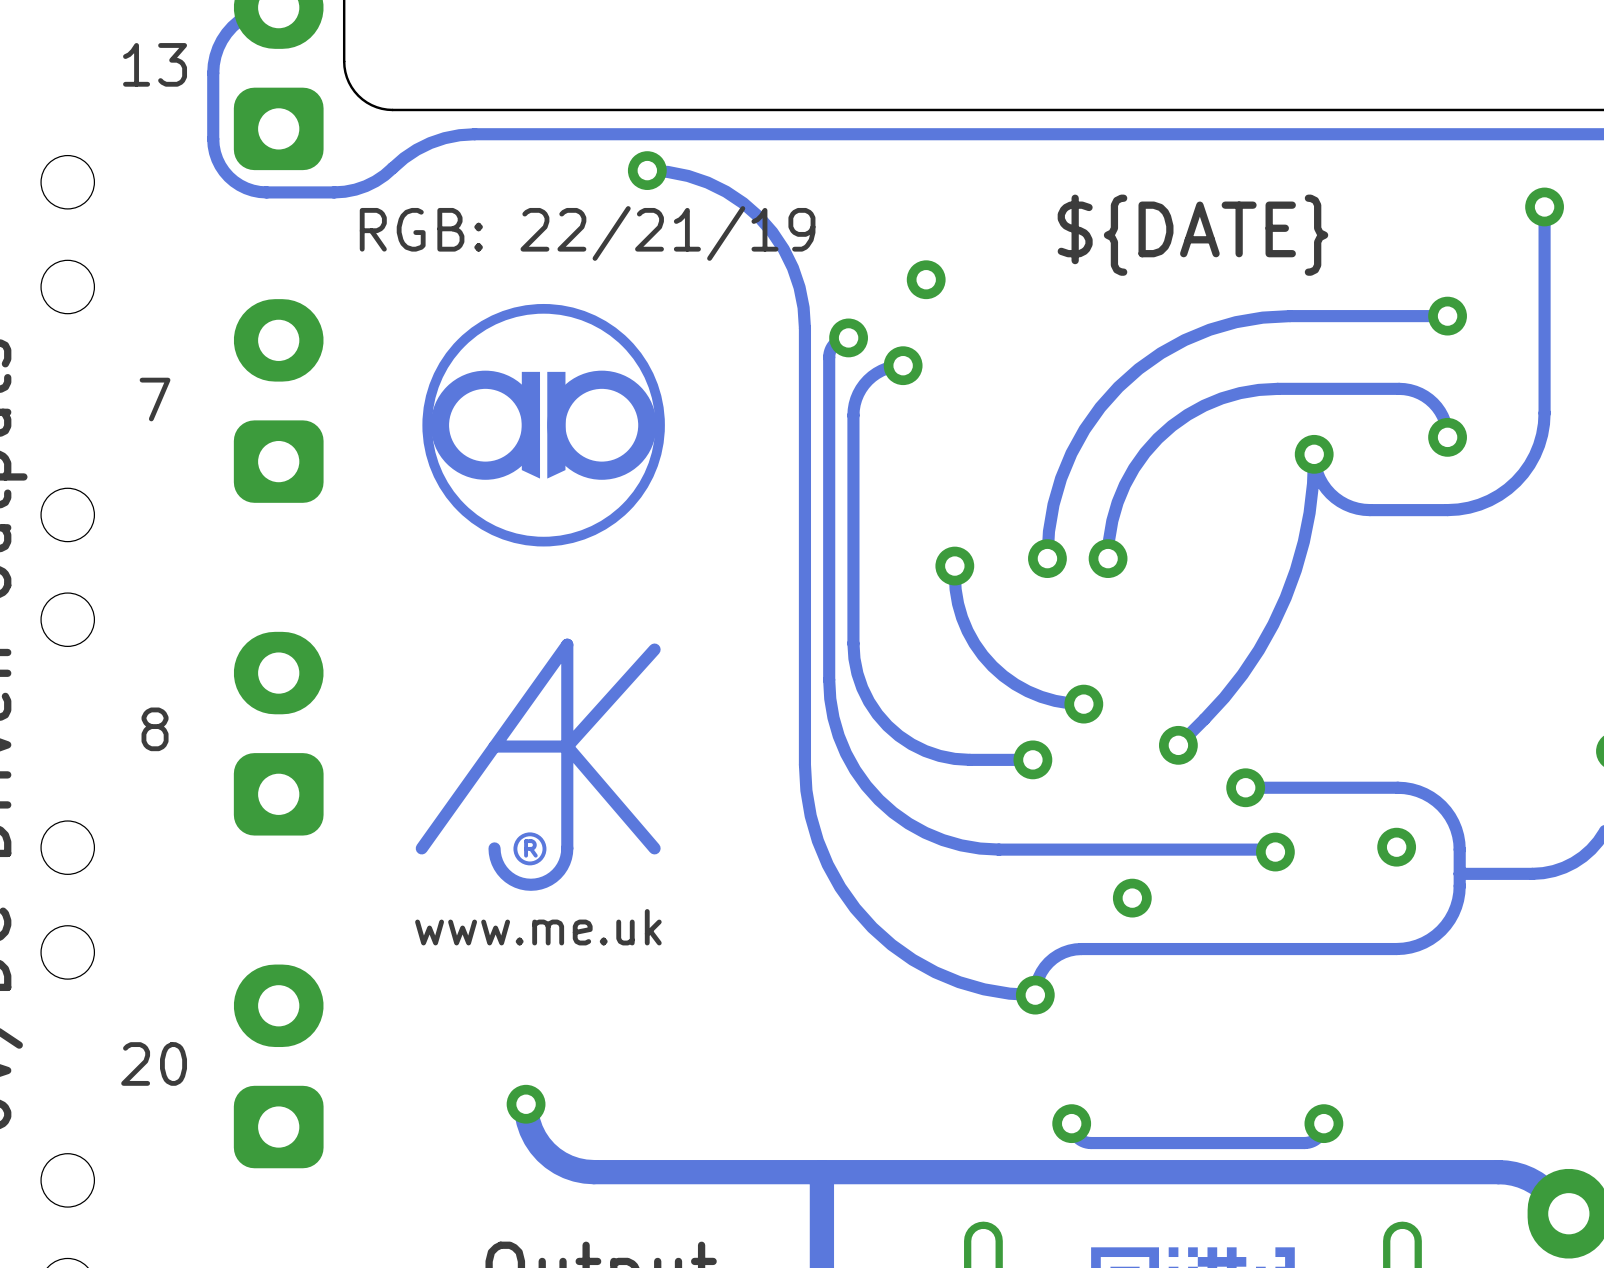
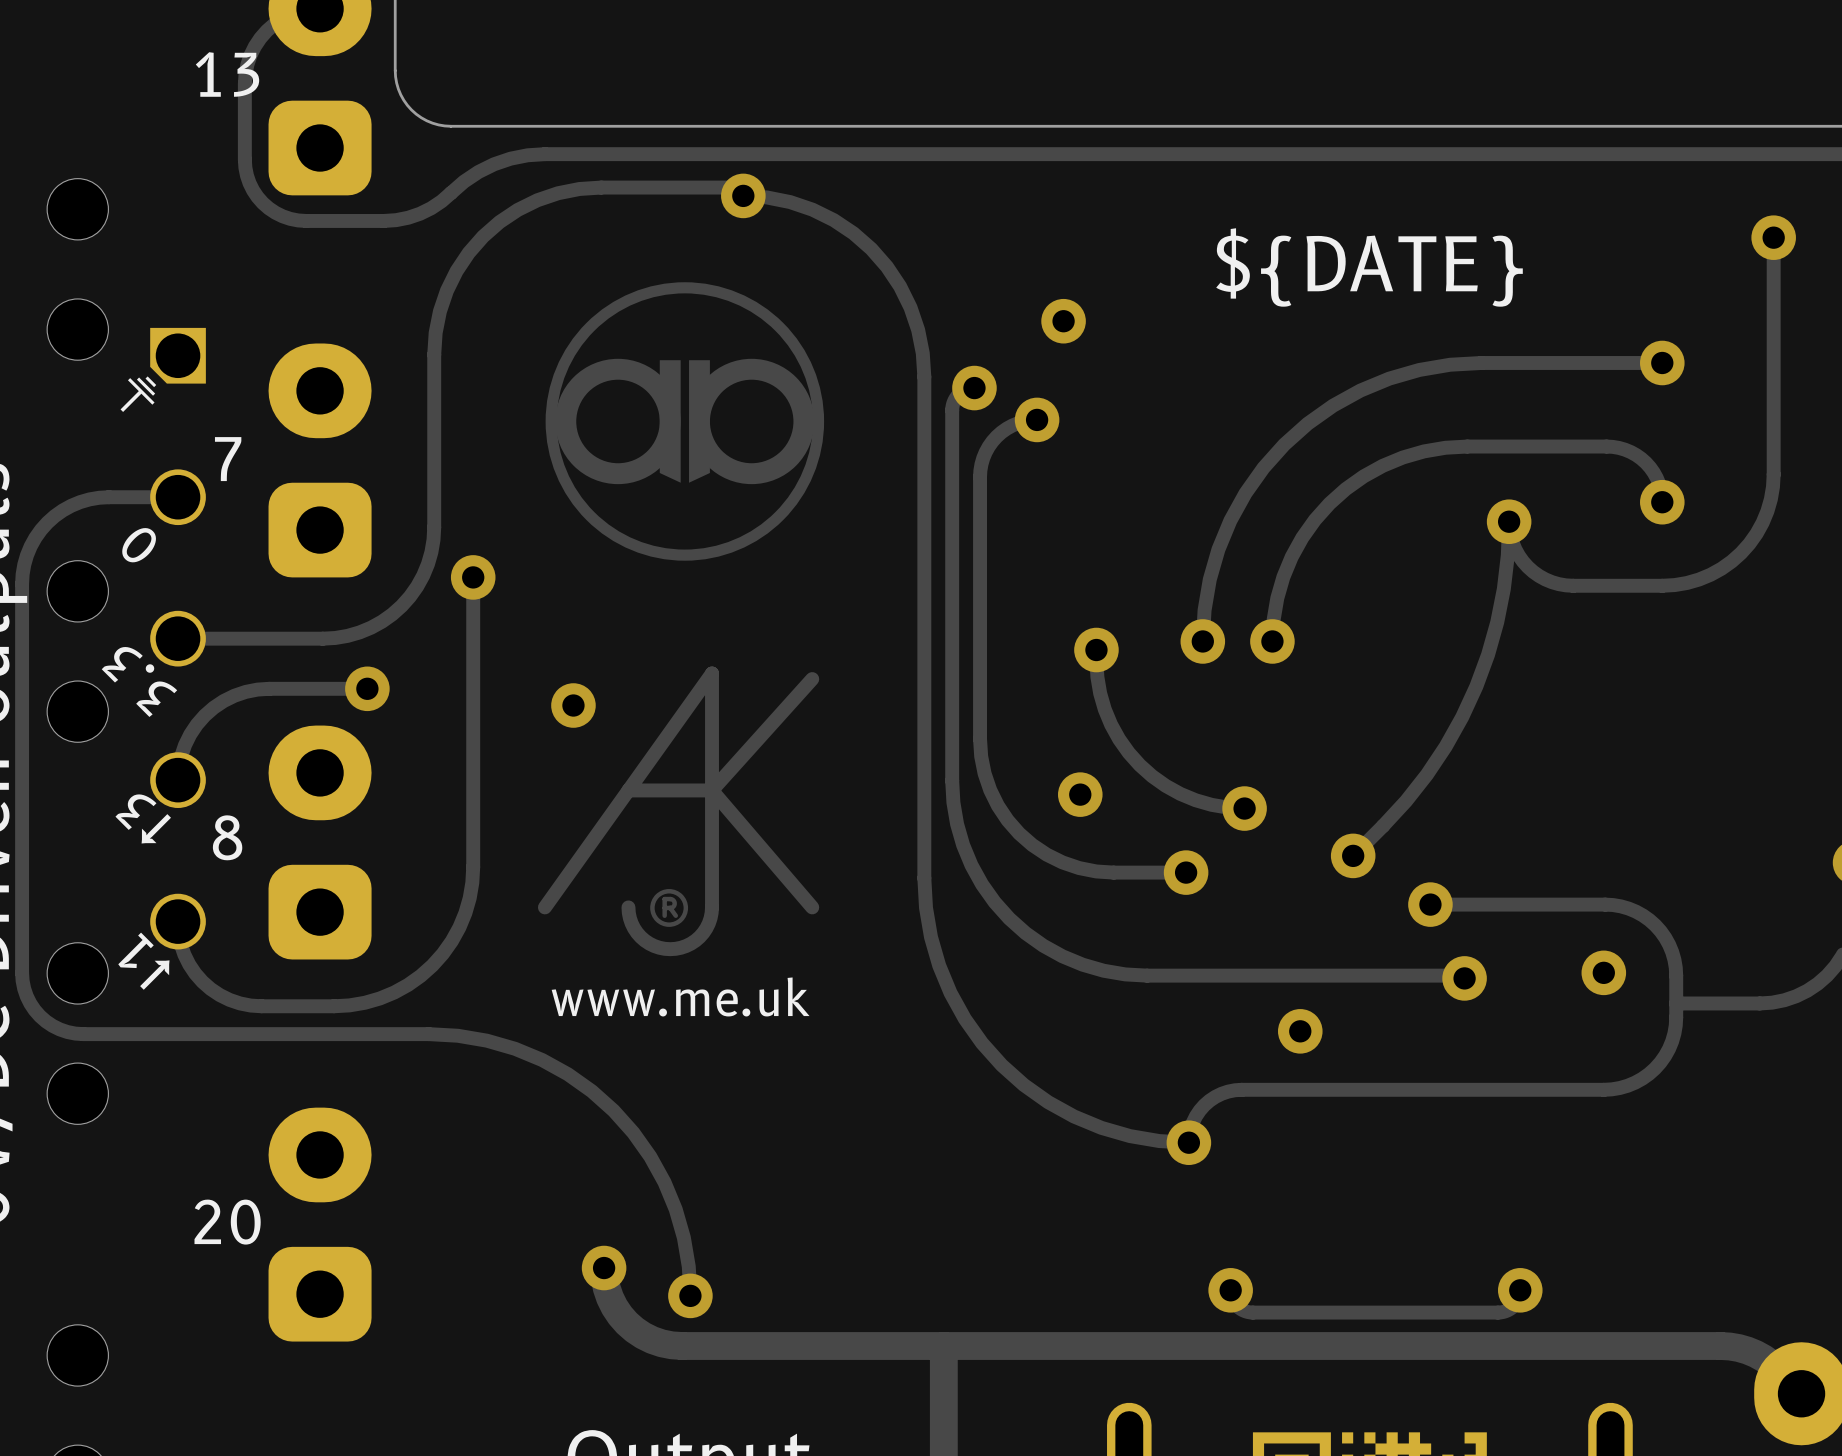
text position: 13 (155, 64) -> 13 (227, 74)
track: none -> (743, 195) (740, 190) (734, 187) (579, 188) (537, 200) (499, 222) (468, 252) (456, 271) (439, 311) (434, 354) (433, 539) (427, 564) (409, 596) (382, 621) (347, 635) (322, 638) (178, 638)
text: RGB: 22/21/19 (587, 233) -> none
text position: 7 (155, 399) -> 7 (228, 459)
drawing position: (543, 425) -> (684, 421)
track: none -> (178, 497) (108, 497) (80, 502) (62, 510) (47, 522) (35, 537) (26, 555) (22, 584) (22, 972) (24, 988) (30, 1003) (40, 1016) (52, 1025) (75, 1033) (457, 1035) (486, 1040) (515, 1048) (542, 1060) (567, 1074) (591, 1091) (613, 1110) (633, 1132) (650, 1156) (664, 1182) (675, 1209) (683, 1237) (688, 1266) (690, 1295)
track: none -> (473, 577) (472, 882) (469, 898) (459, 927) (442, 953) (420, 975) (408, 984) (379, 998) (364, 1002) (333, 1006) (250, 1005) (219, 995) (195, 973) (180, 944) (178, 922)
via: none -> (473, 577)
part: none -> (178, 638)
track: none -> (367, 688) (269, 688) (245, 691) (234, 695) (223, 701) (204, 715) (190, 734) (181, 756) (178, 780)
via: none -> (367, 688)
via: none -> (573, 705)
via: none -> (1080, 794)
text position: 8 (155, 729) -> 8 (227, 837)
drawing position: (538, 764) -> (678, 811)
text position: 20 (154, 1063) -> 20 (227, 1222)
via: none -> (690, 1295)

